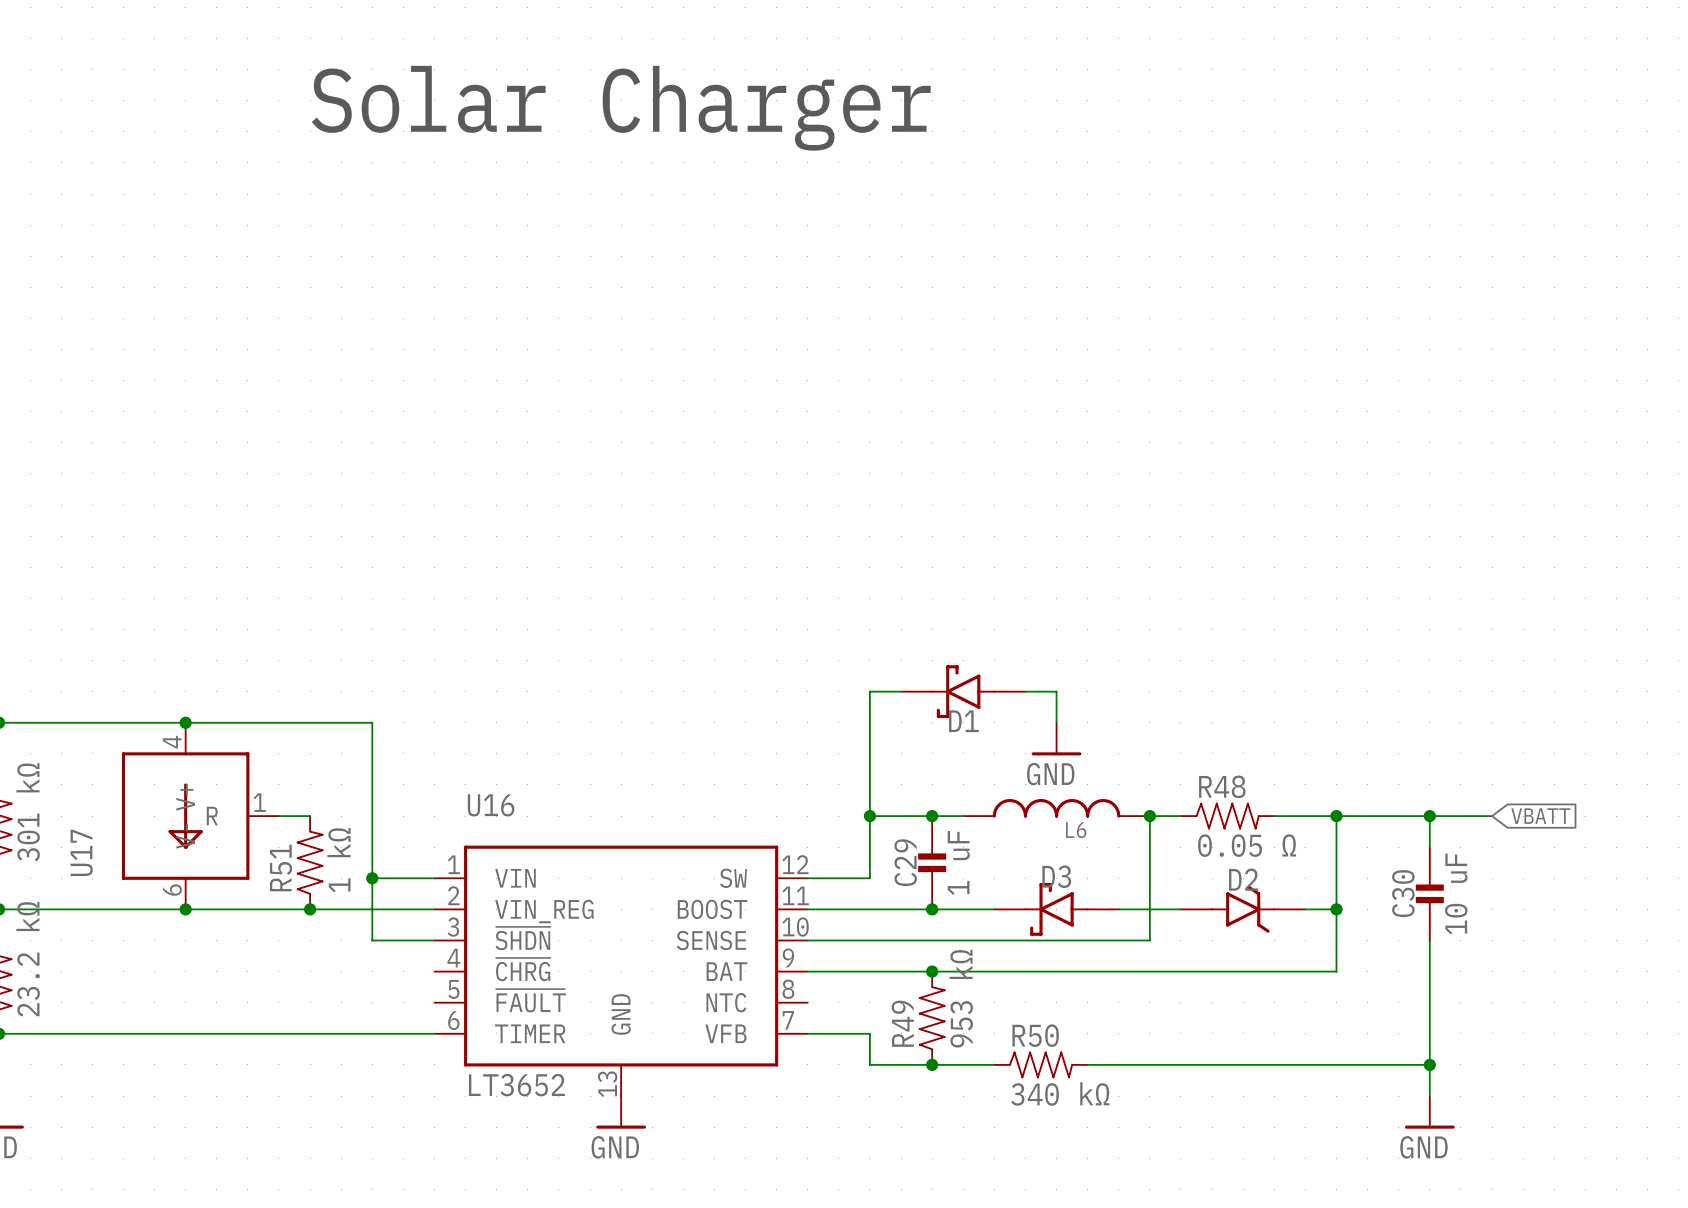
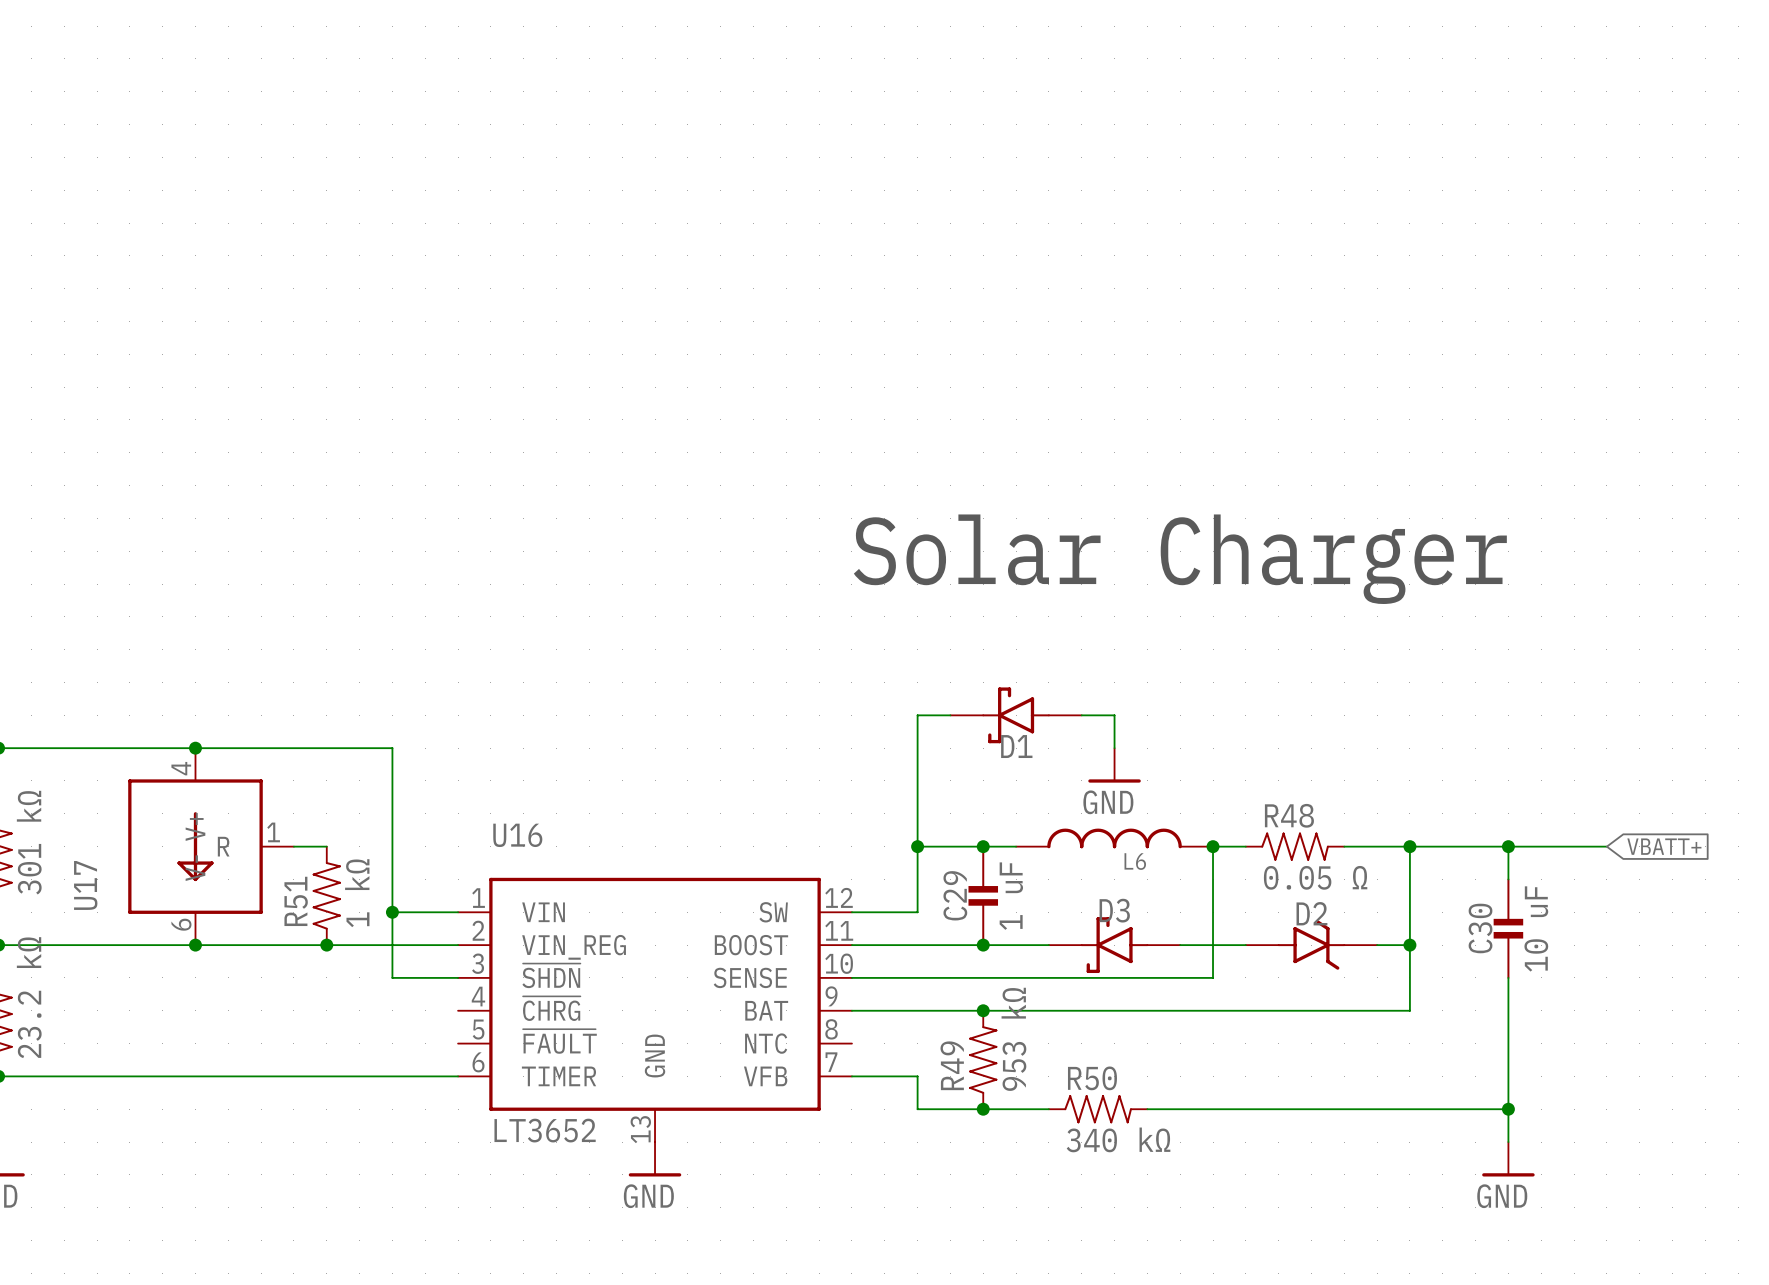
text: Solar Charger (621, 108) -> none
text: none -> Solar Charger (1180, 559)
wire: none -> (1574, 846) (1606, 846)
global label: VBATT (1540, 816) -> VBATT+ (1664, 846)

